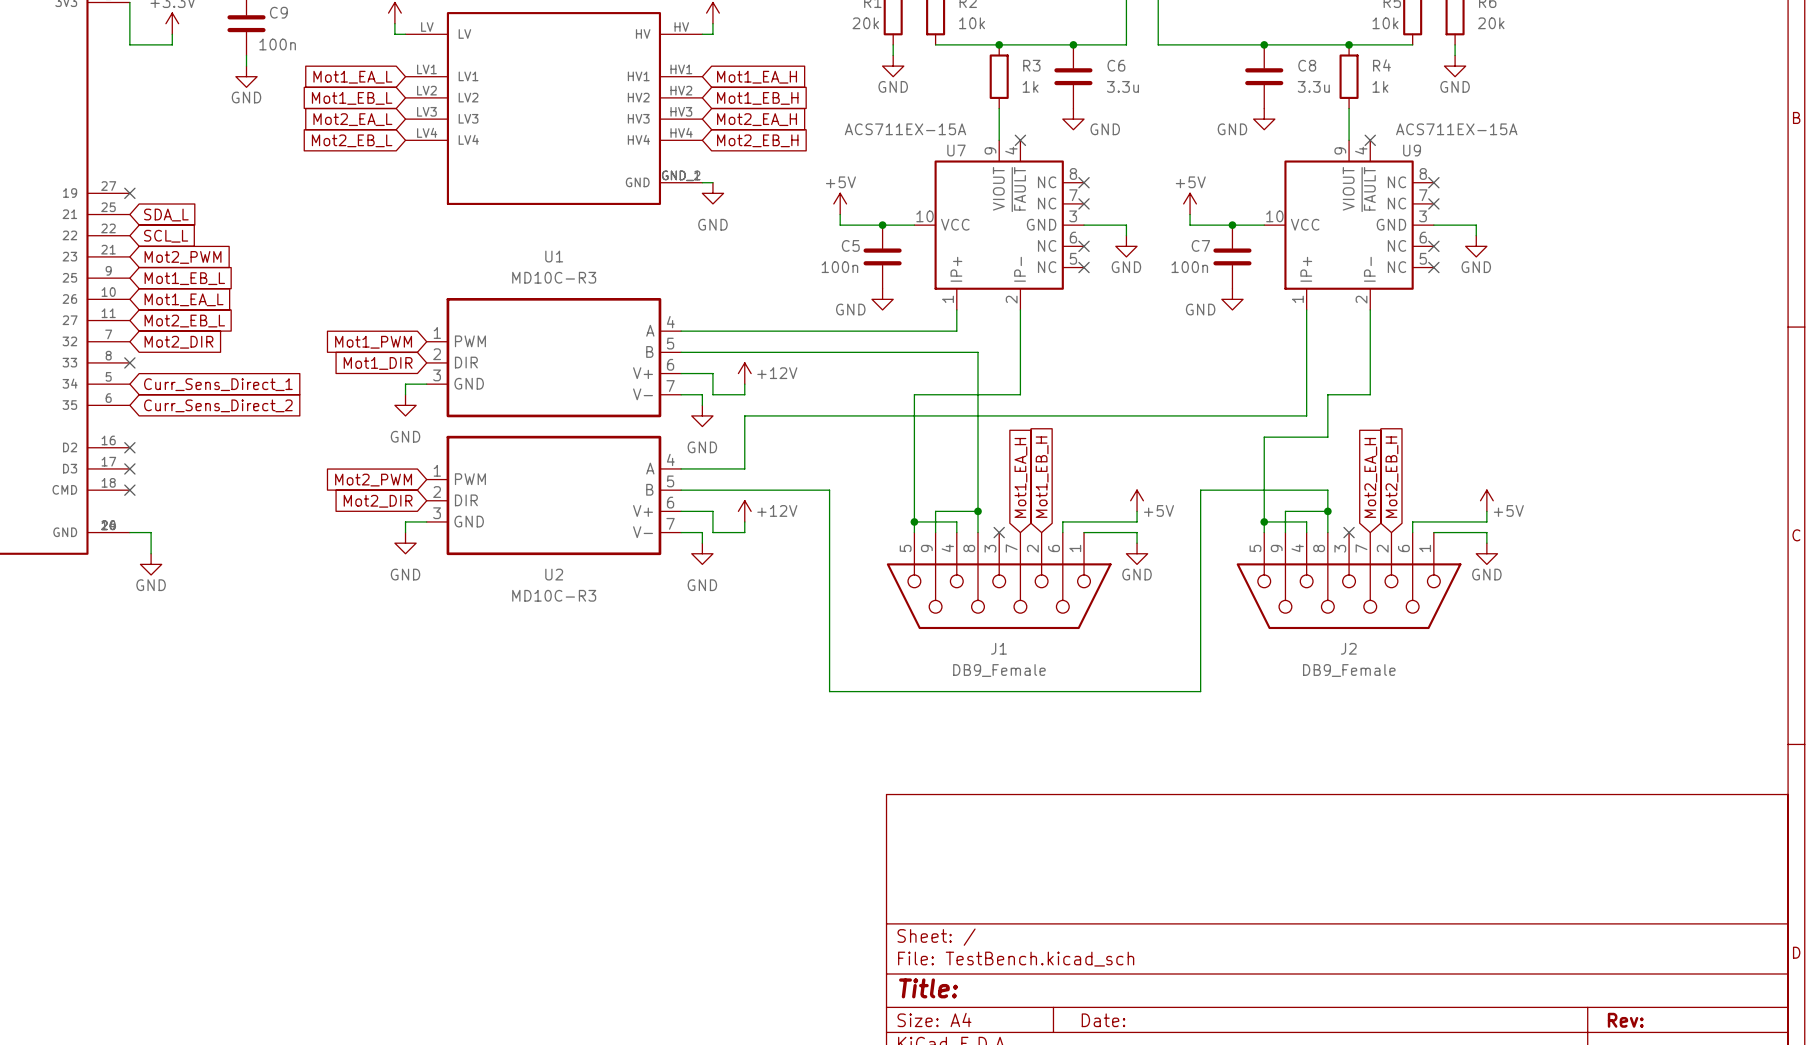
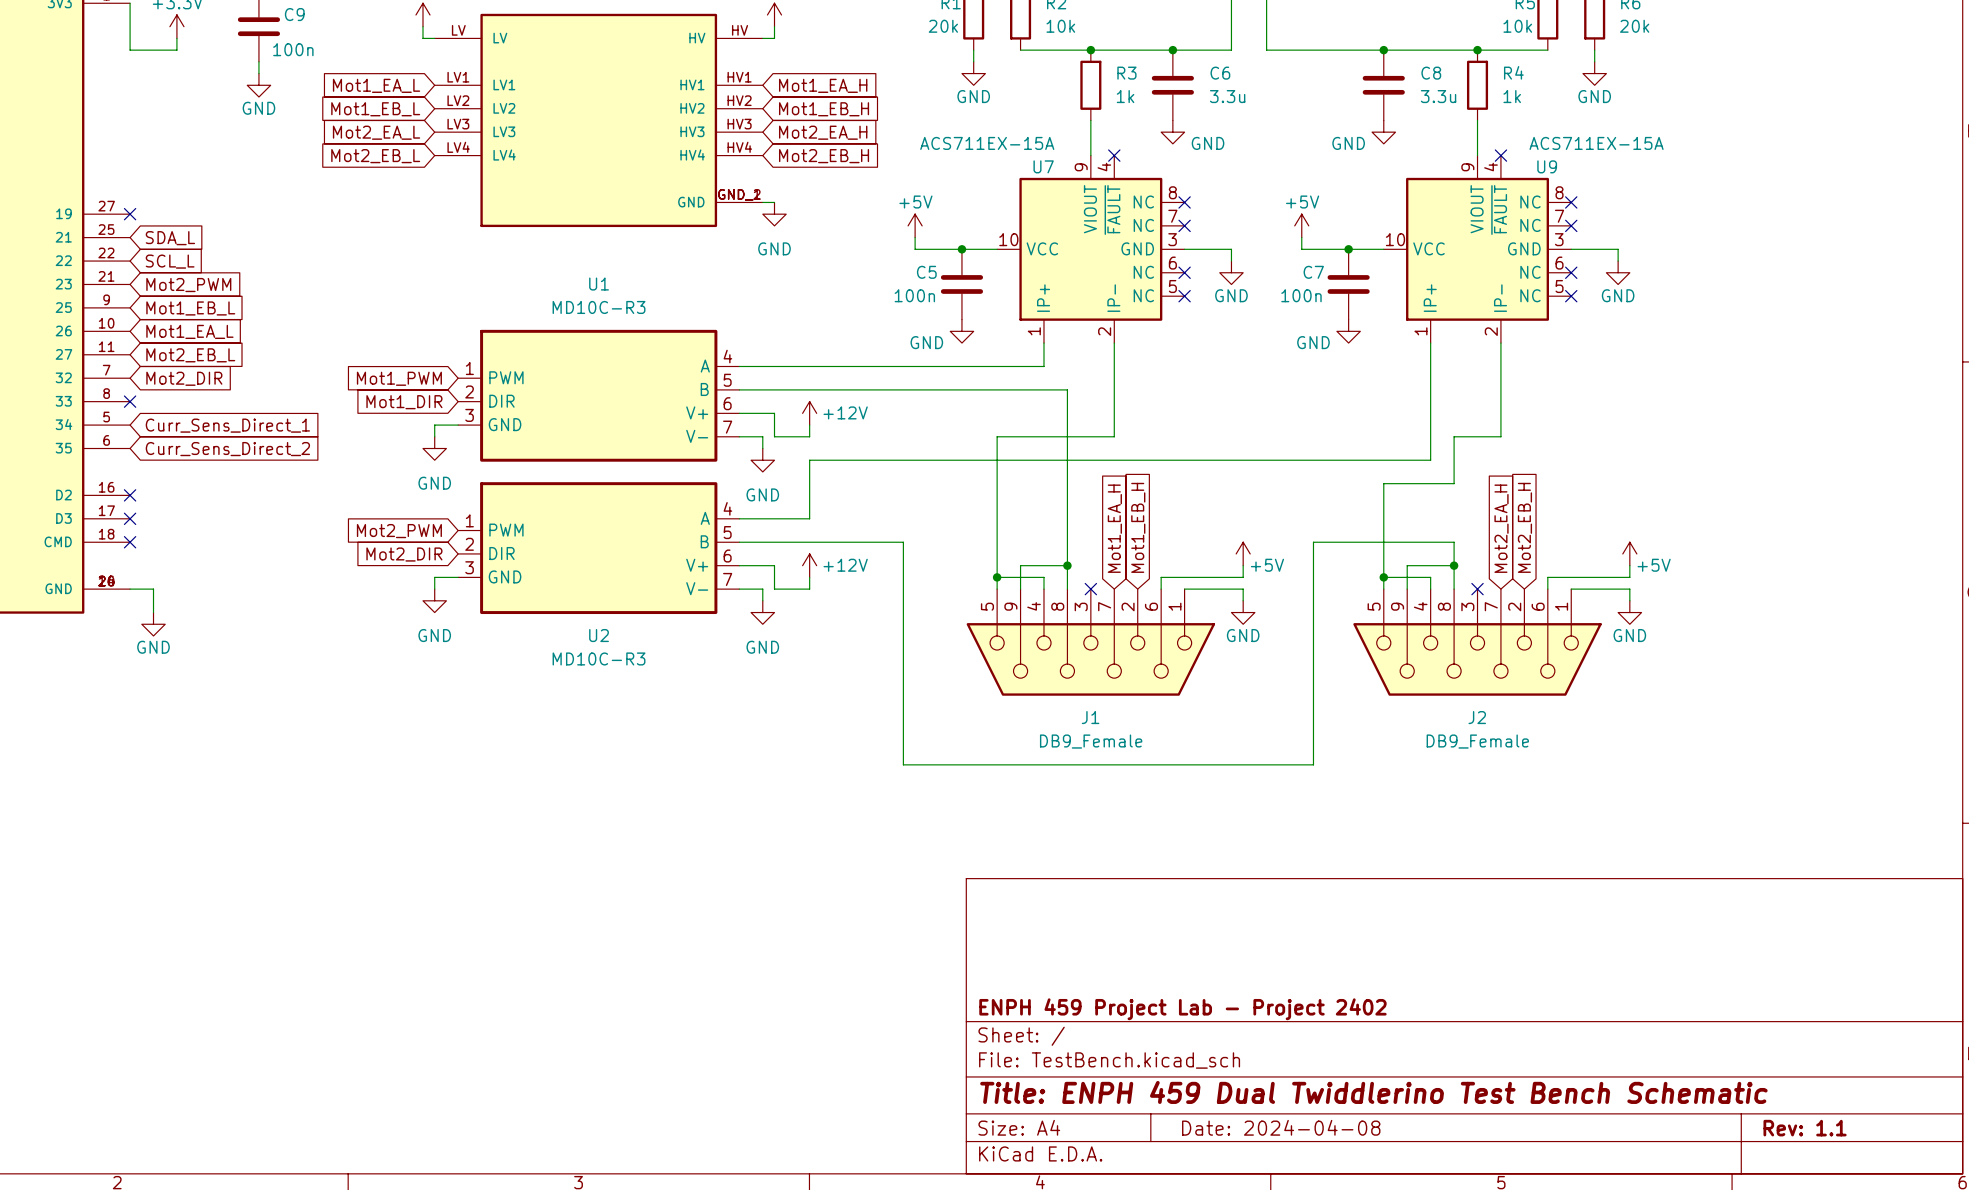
title block: none -> ENPH 459 Project Lab - Project 2402 (1182, 1009)
title block: Title: (928, 988) -> Title: ENPH 459 Dual Twiddlerino Test Bench Schematic (1373, 1092)
title block: Date: (1103, 1020) -> Date: 2024-04-08 (1281, 1127)
title block: Rev: (1625, 1020) -> Rev: 1.1 (1805, 1128)

